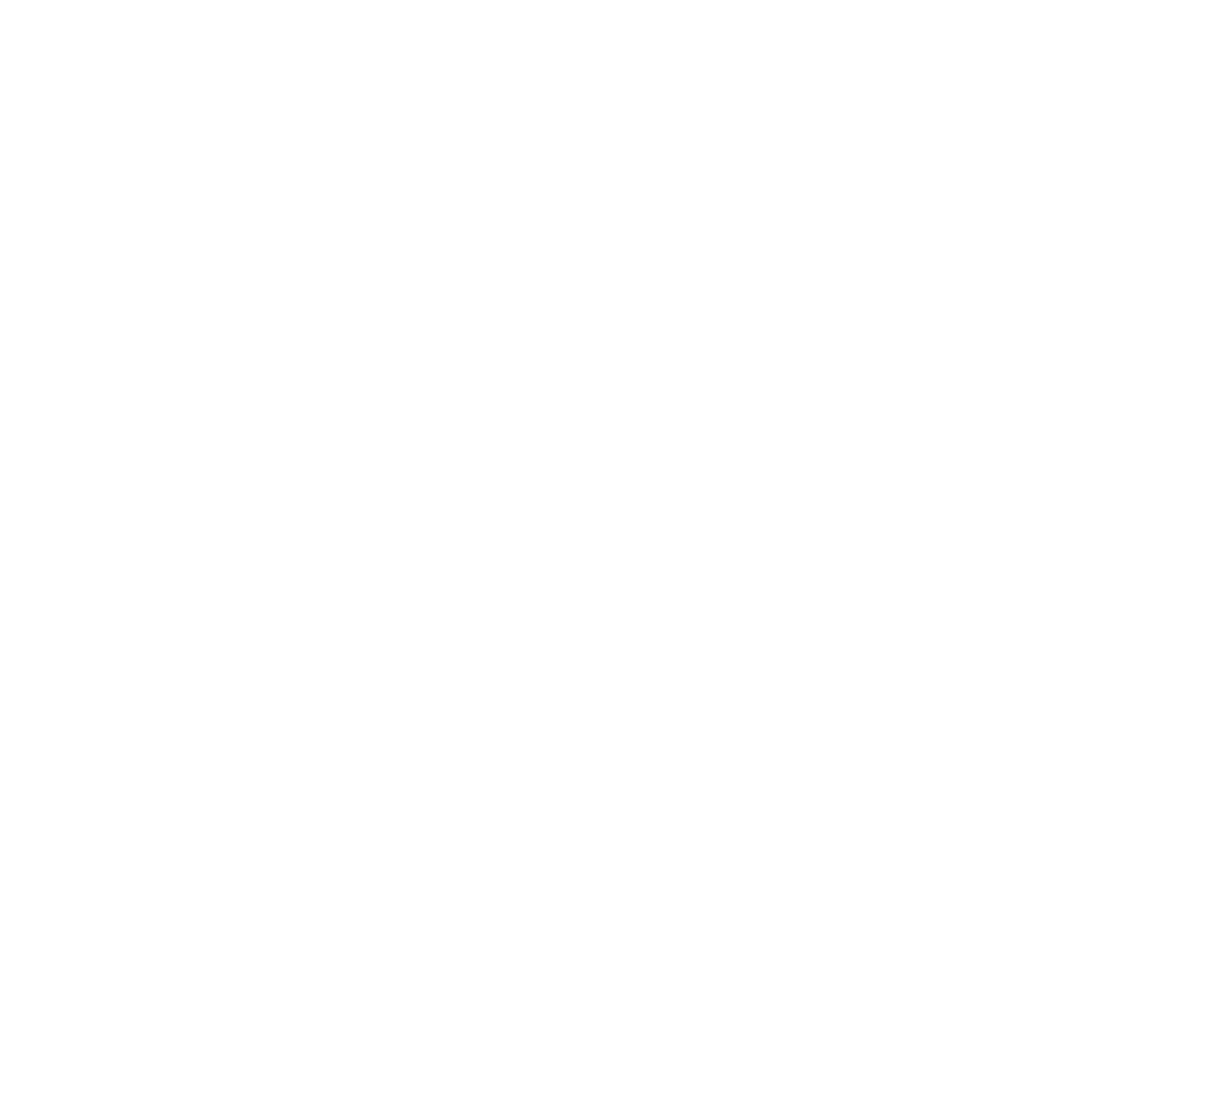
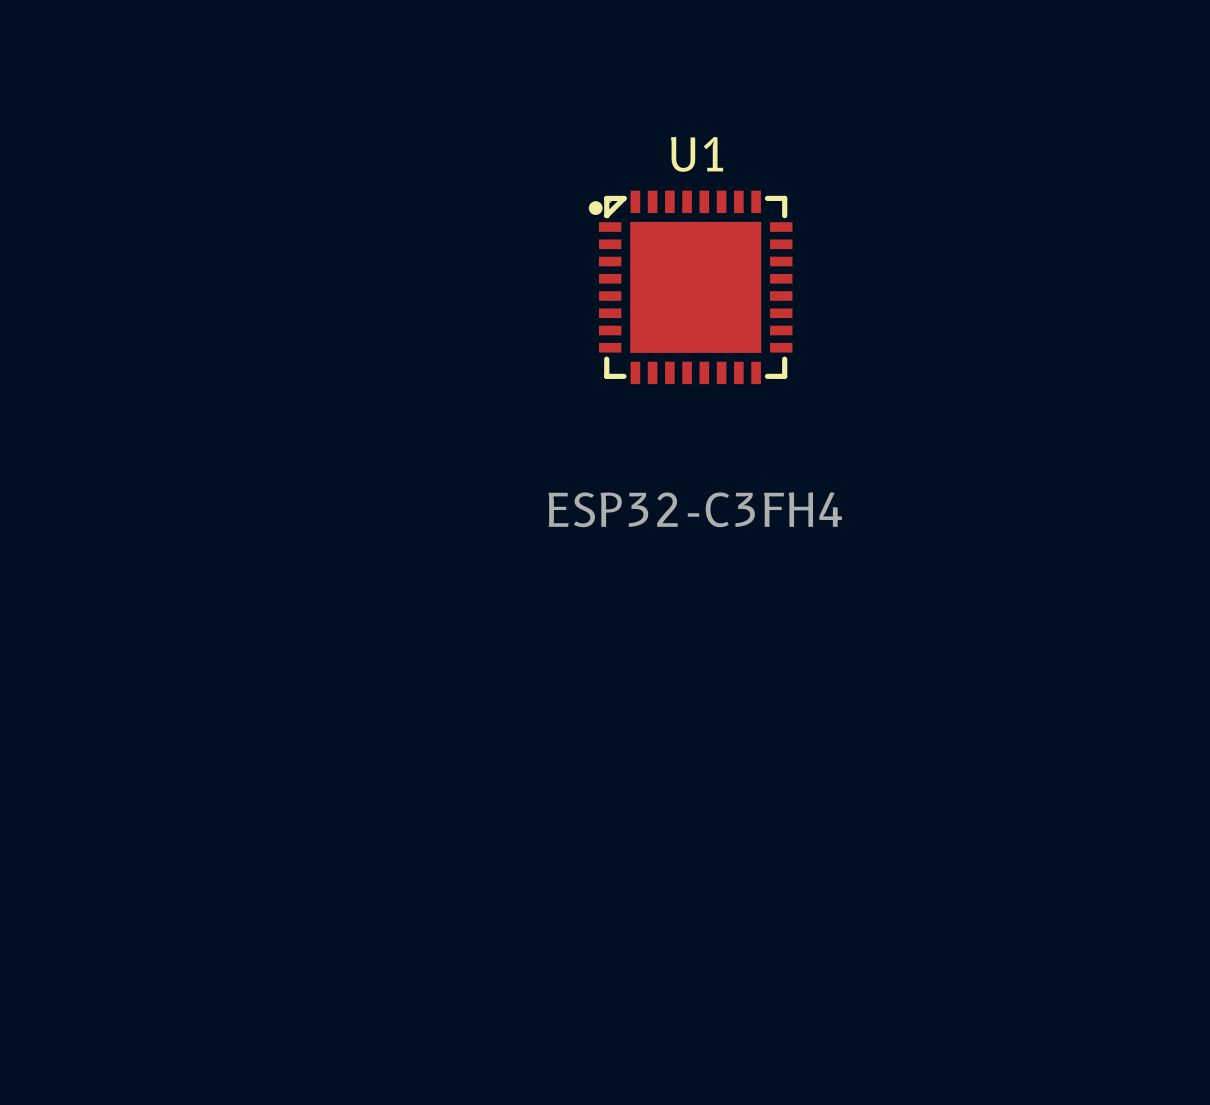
U1: none -> ESP32-C3FH4 (690, 287)

